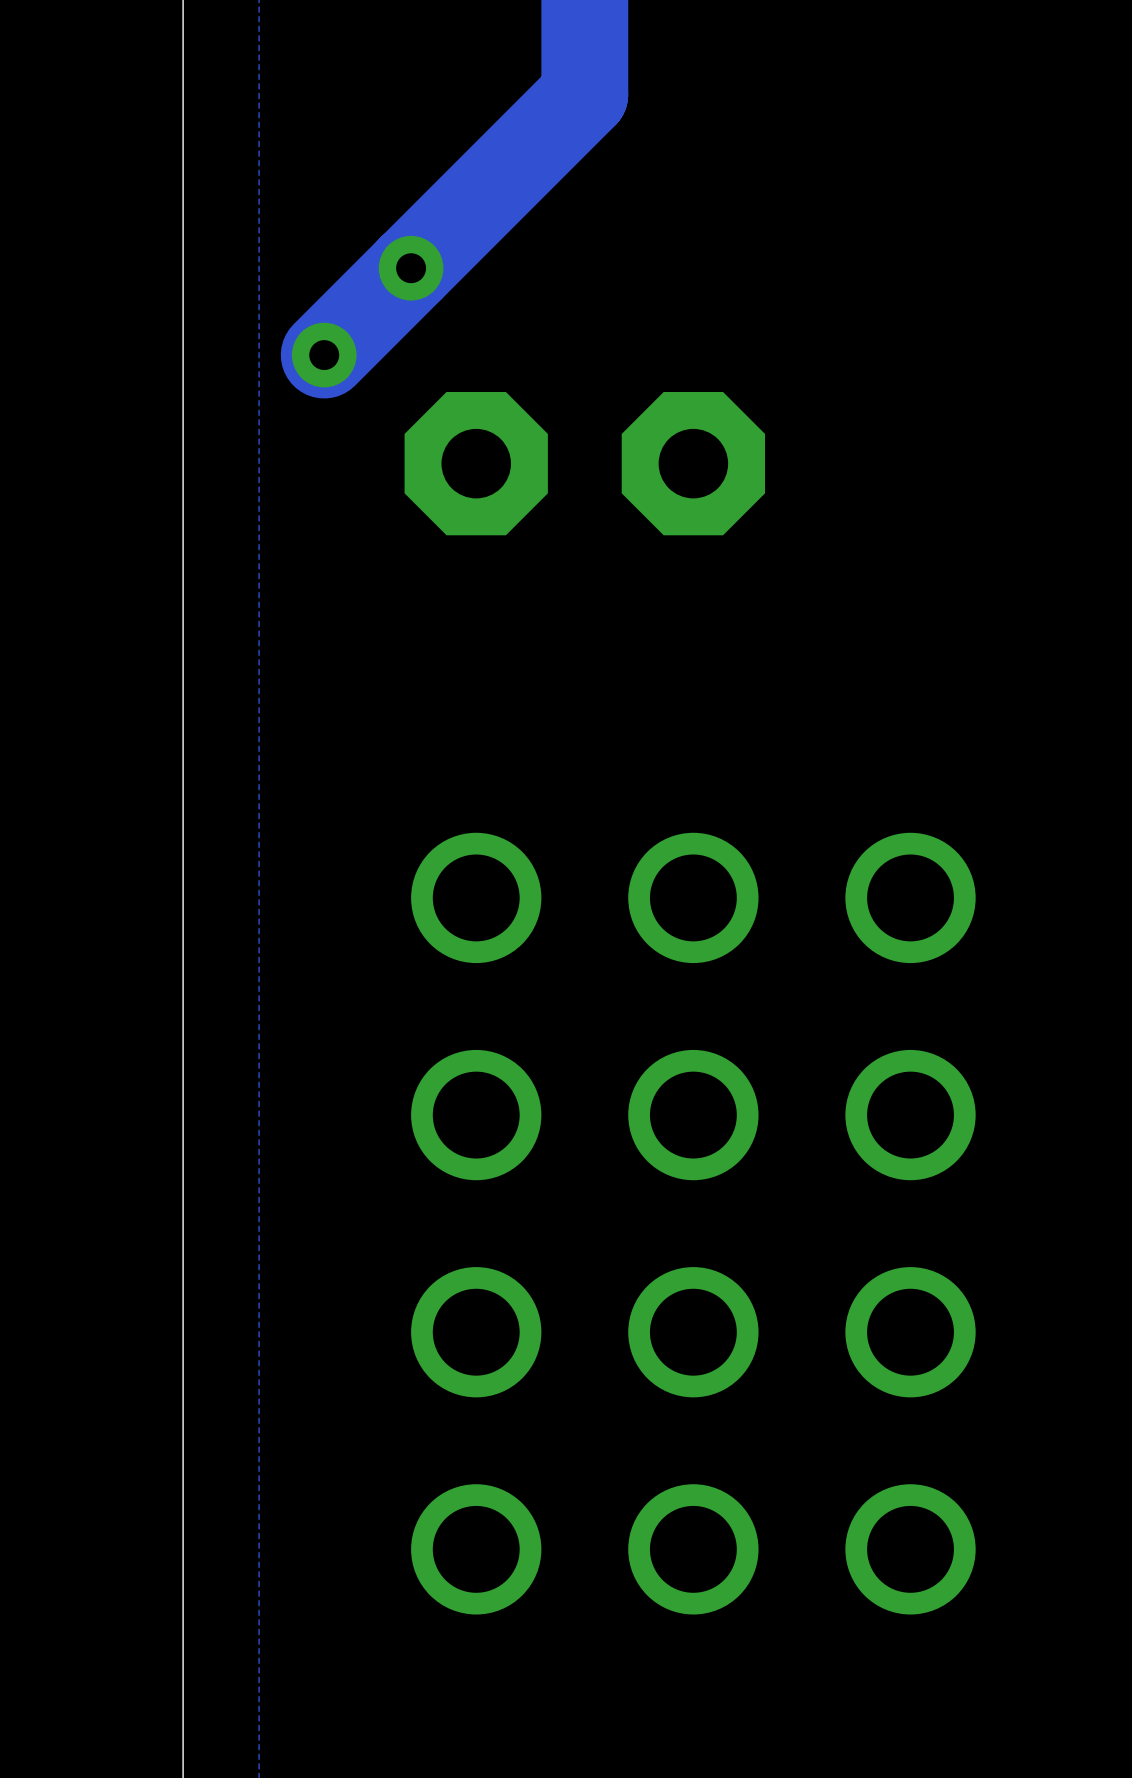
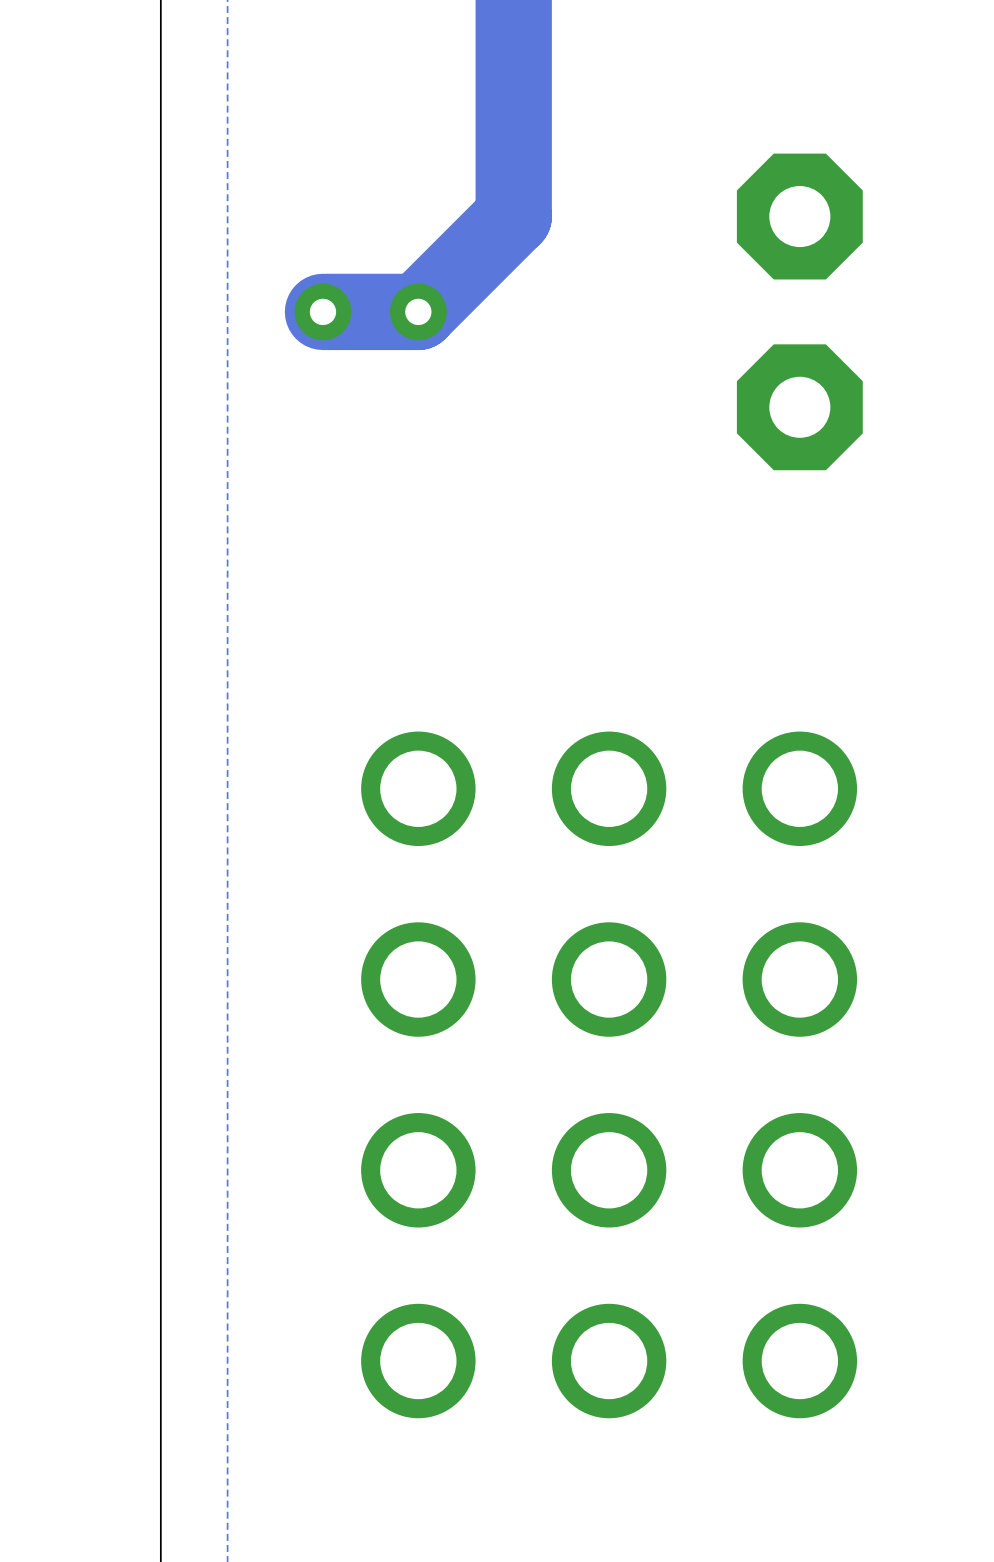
track: (584, 94) (324, 355) -> (513, 83) (513, 216) (418, 311) (322, 311)
via: (411, 268) -> none
via position: (324, 355) -> (322, 311)
via: none -> (418, 311)
part rotation: 0° (584, 463) -> 90° clockwise (799, 311)
part position: (584, 463) -> (799, 311)

